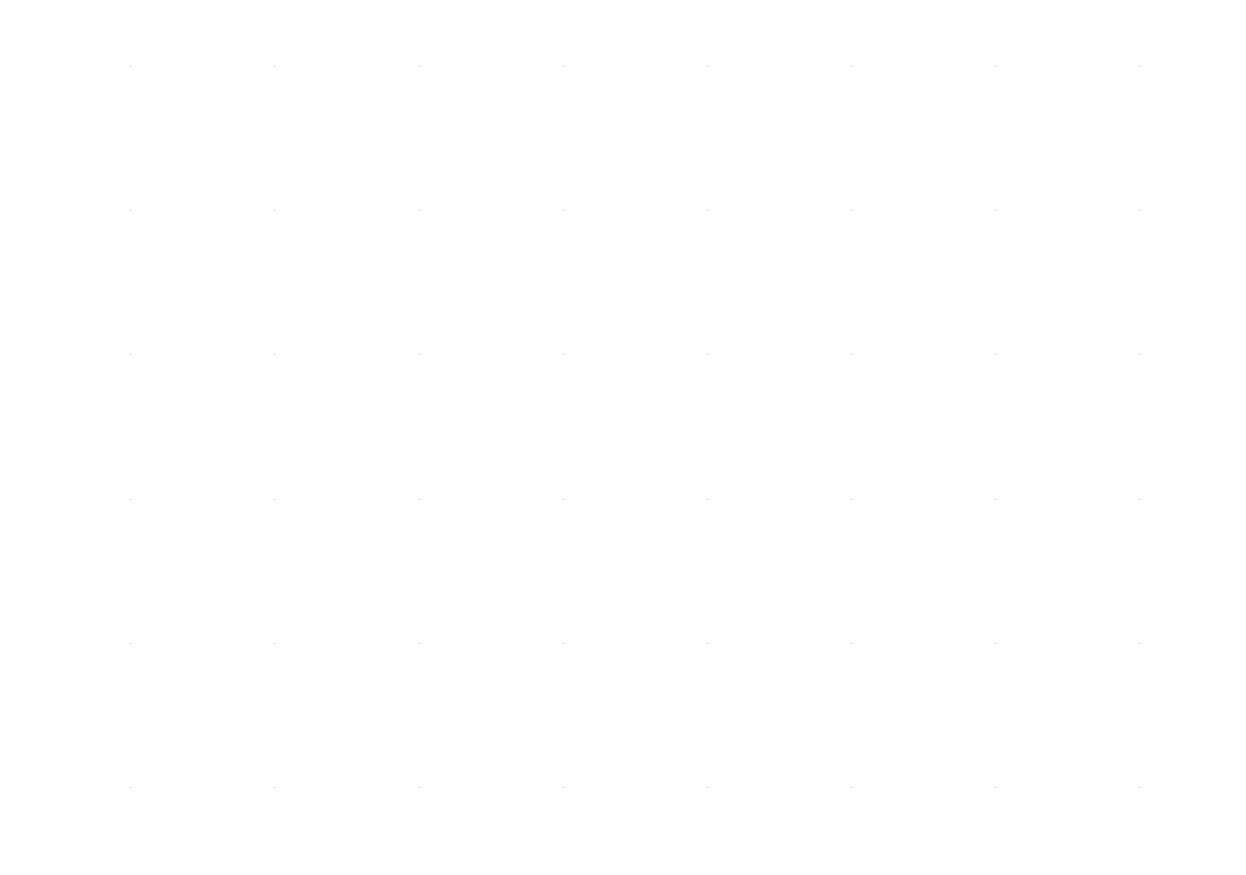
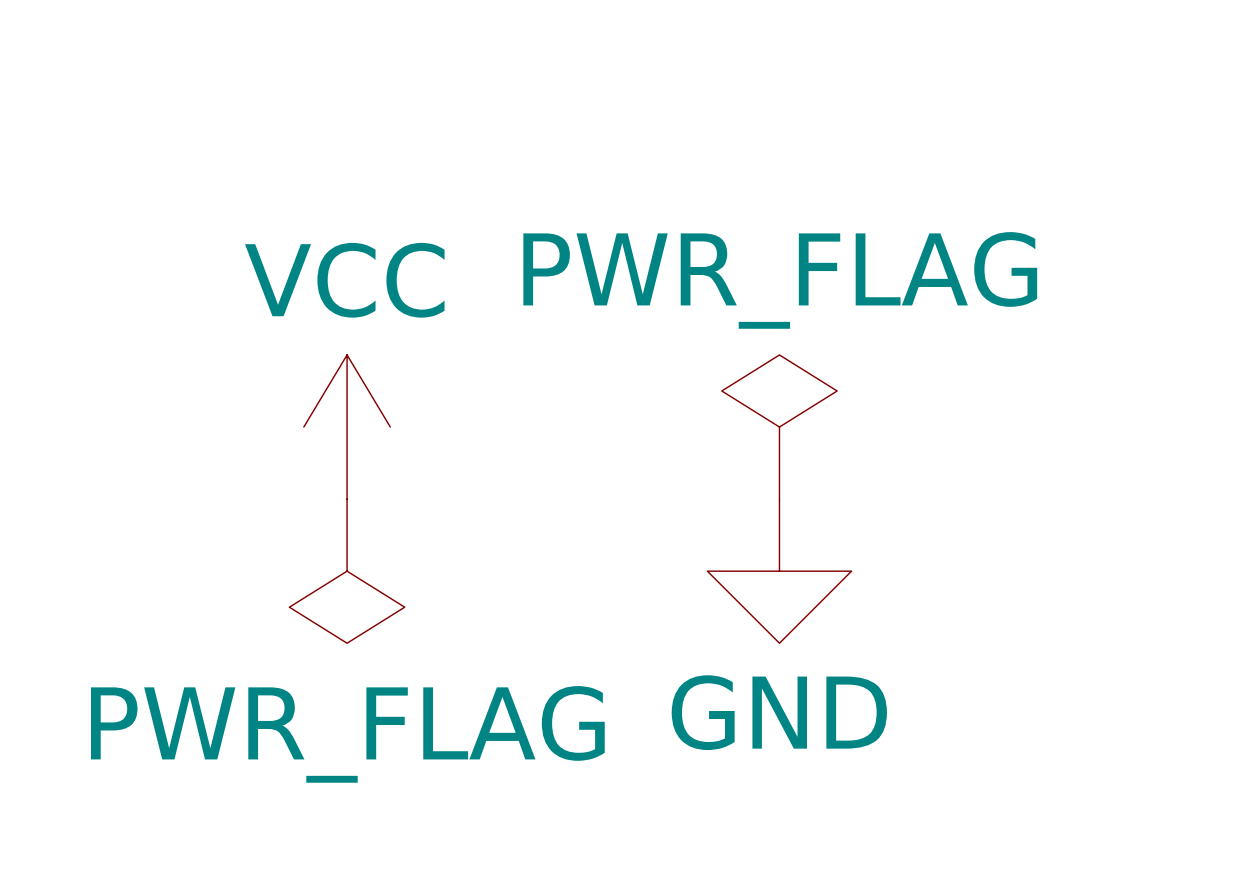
power symbol: none -> VCC (347, 427)
power symbol: none -> PWR_FLAG (779, 427)
power symbol: none -> PWR_FLAG (347, 571)
power symbol: none -> GND (779, 571)

